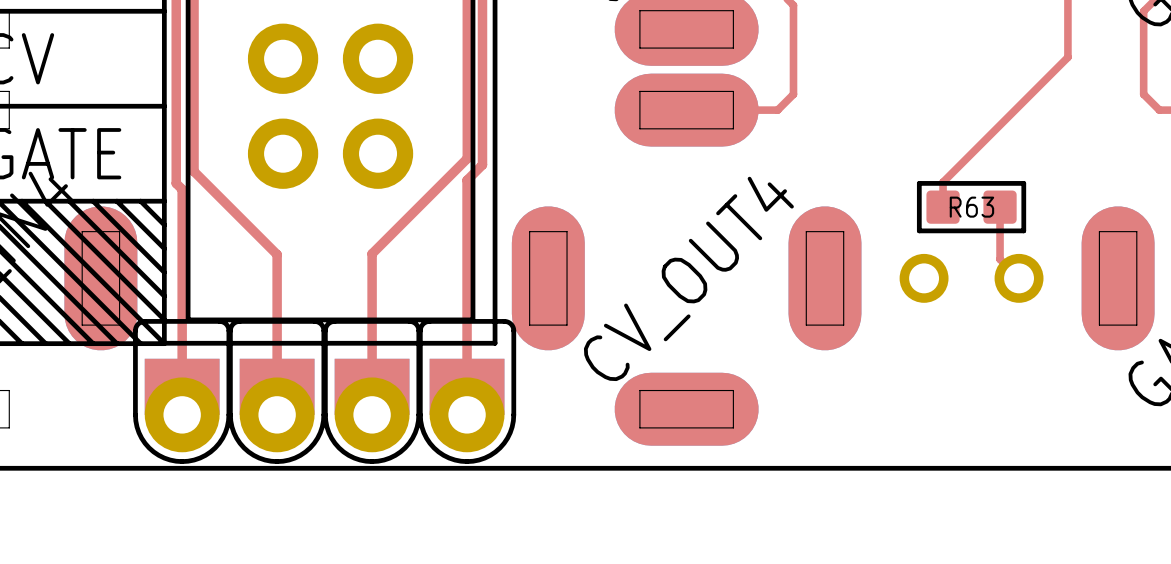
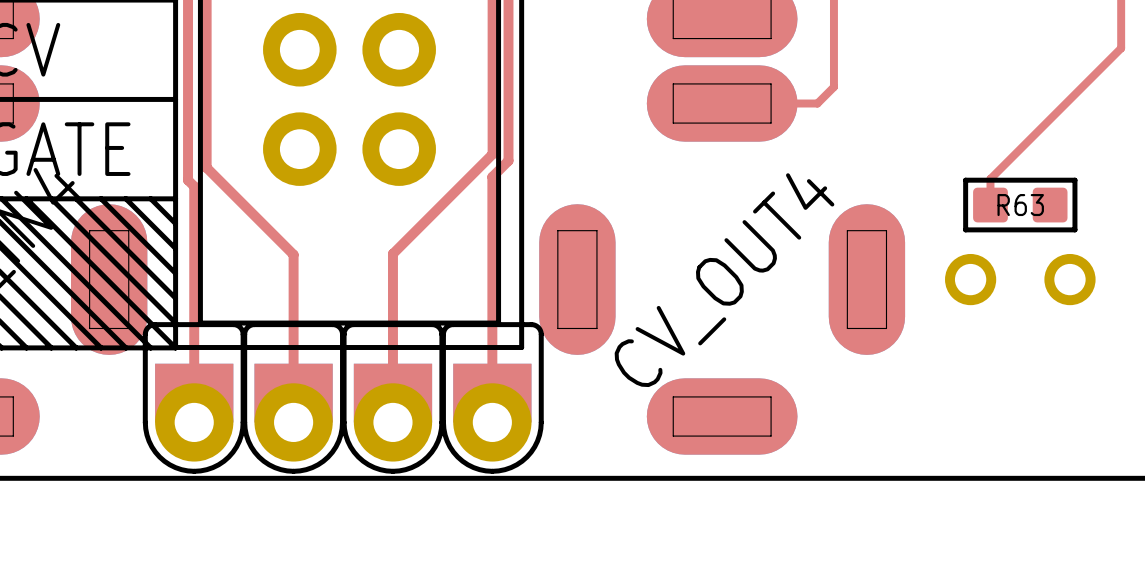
top track: (1000, 207) (1000, 259) (1019, 278) -> none

